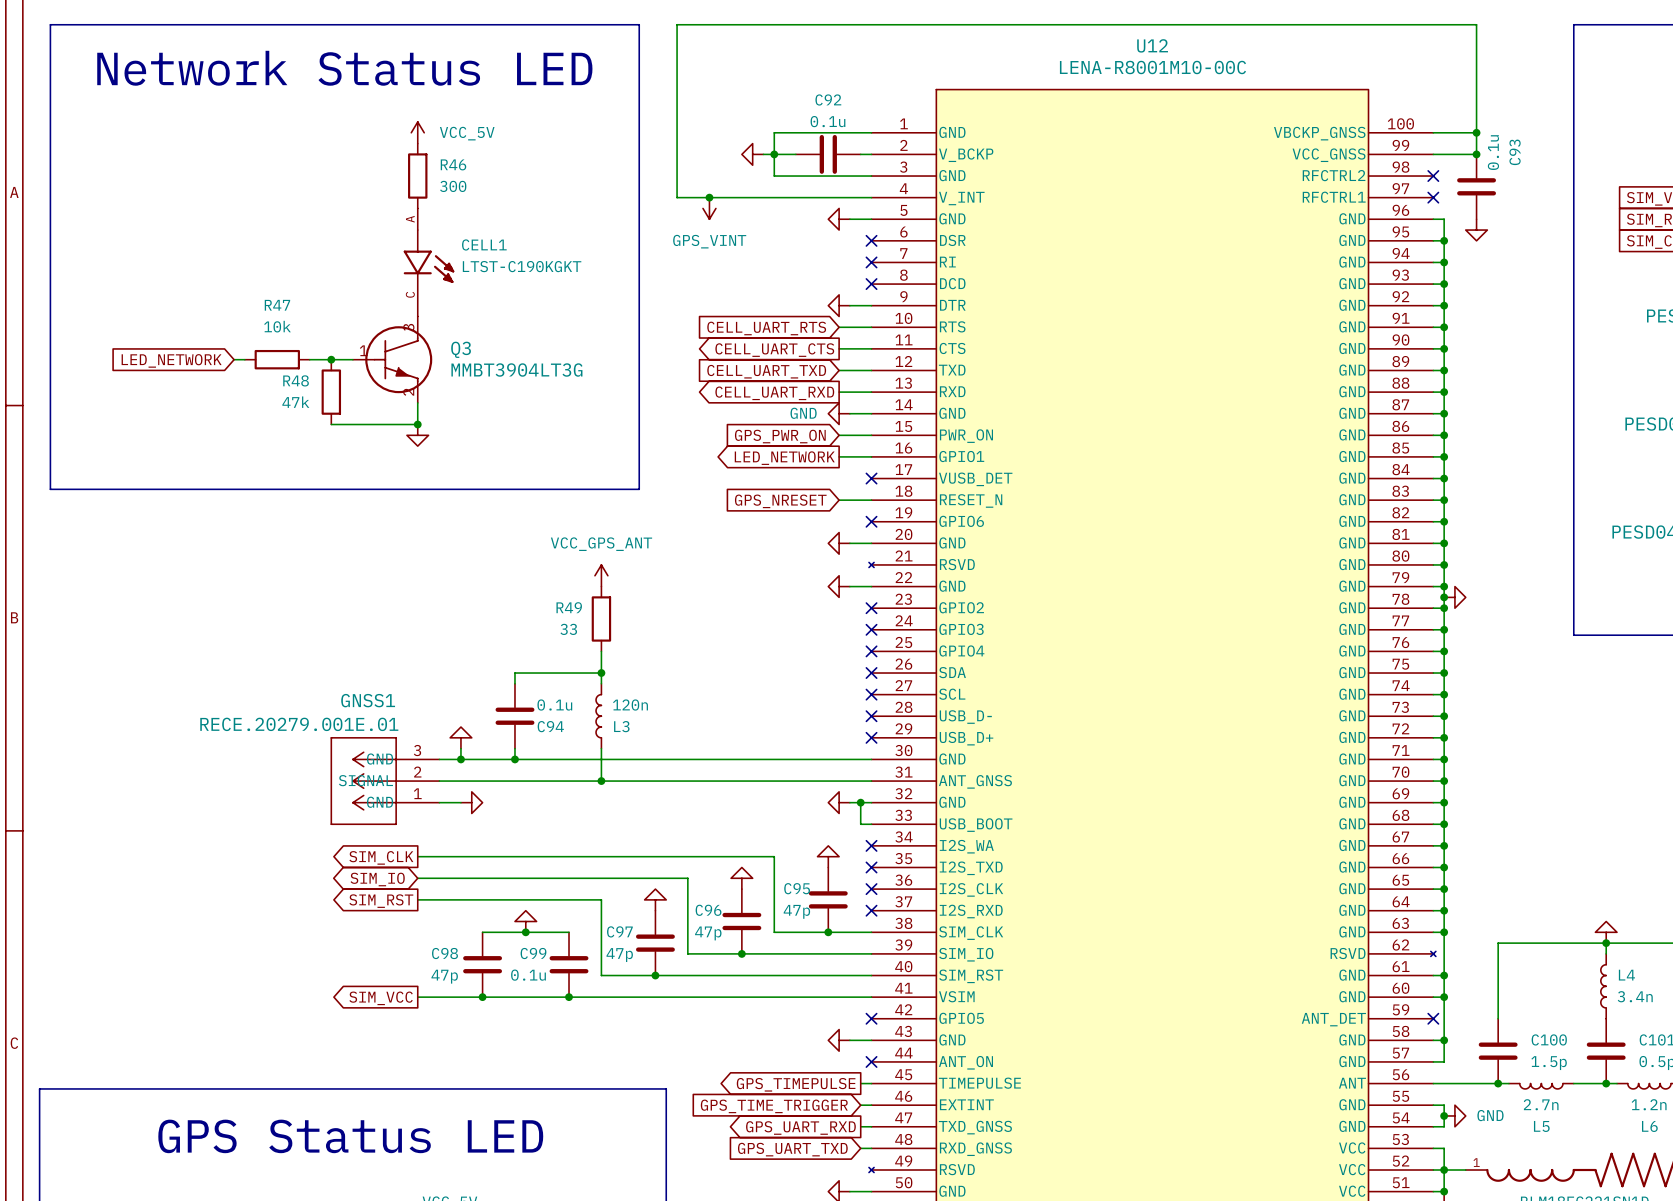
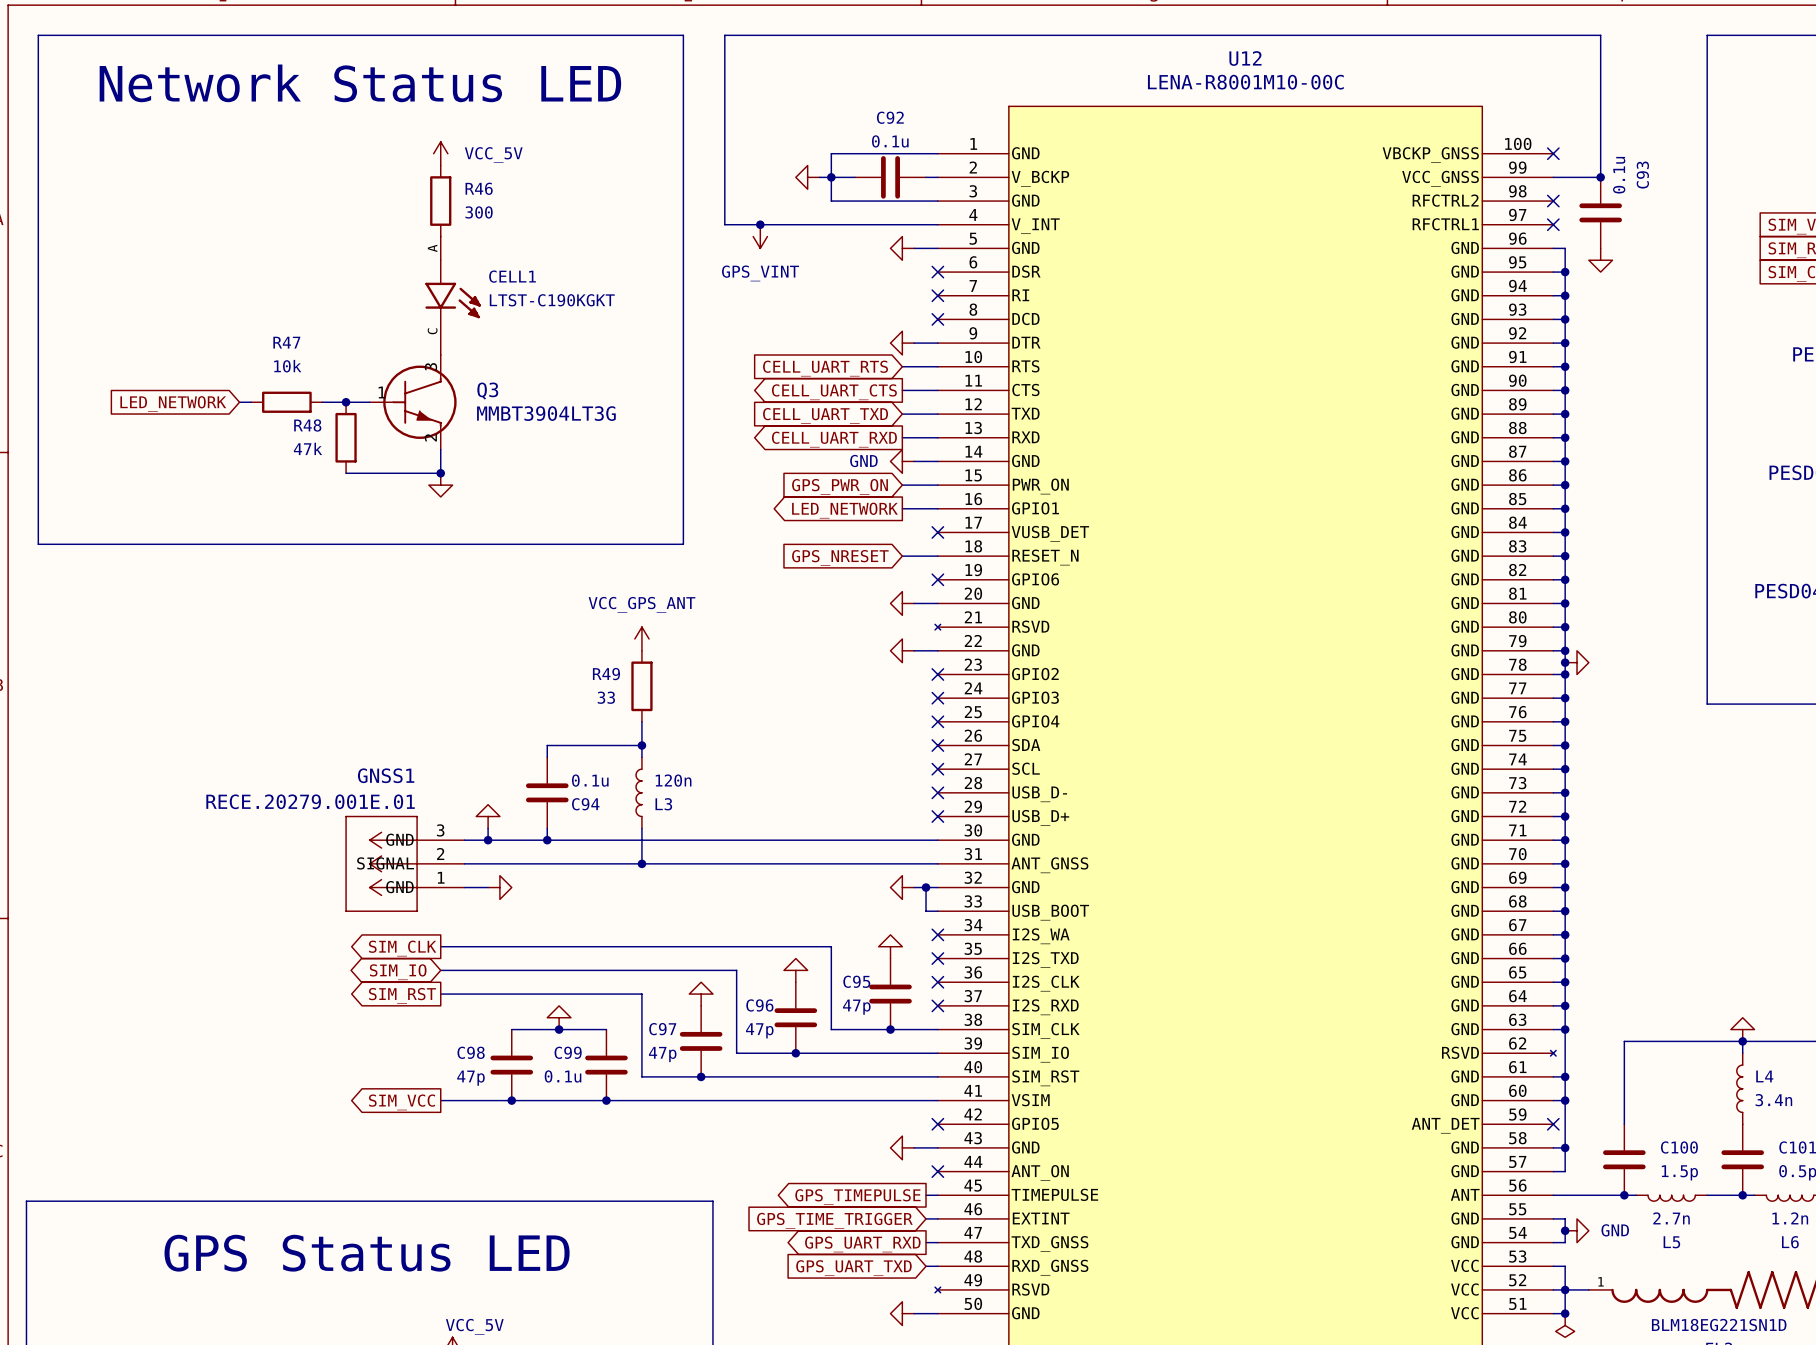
wire: (1433, 132) (1476, 132) -> none
no-connect mark: none -> (1553, 153)
junction: (1476, 132) -> none

